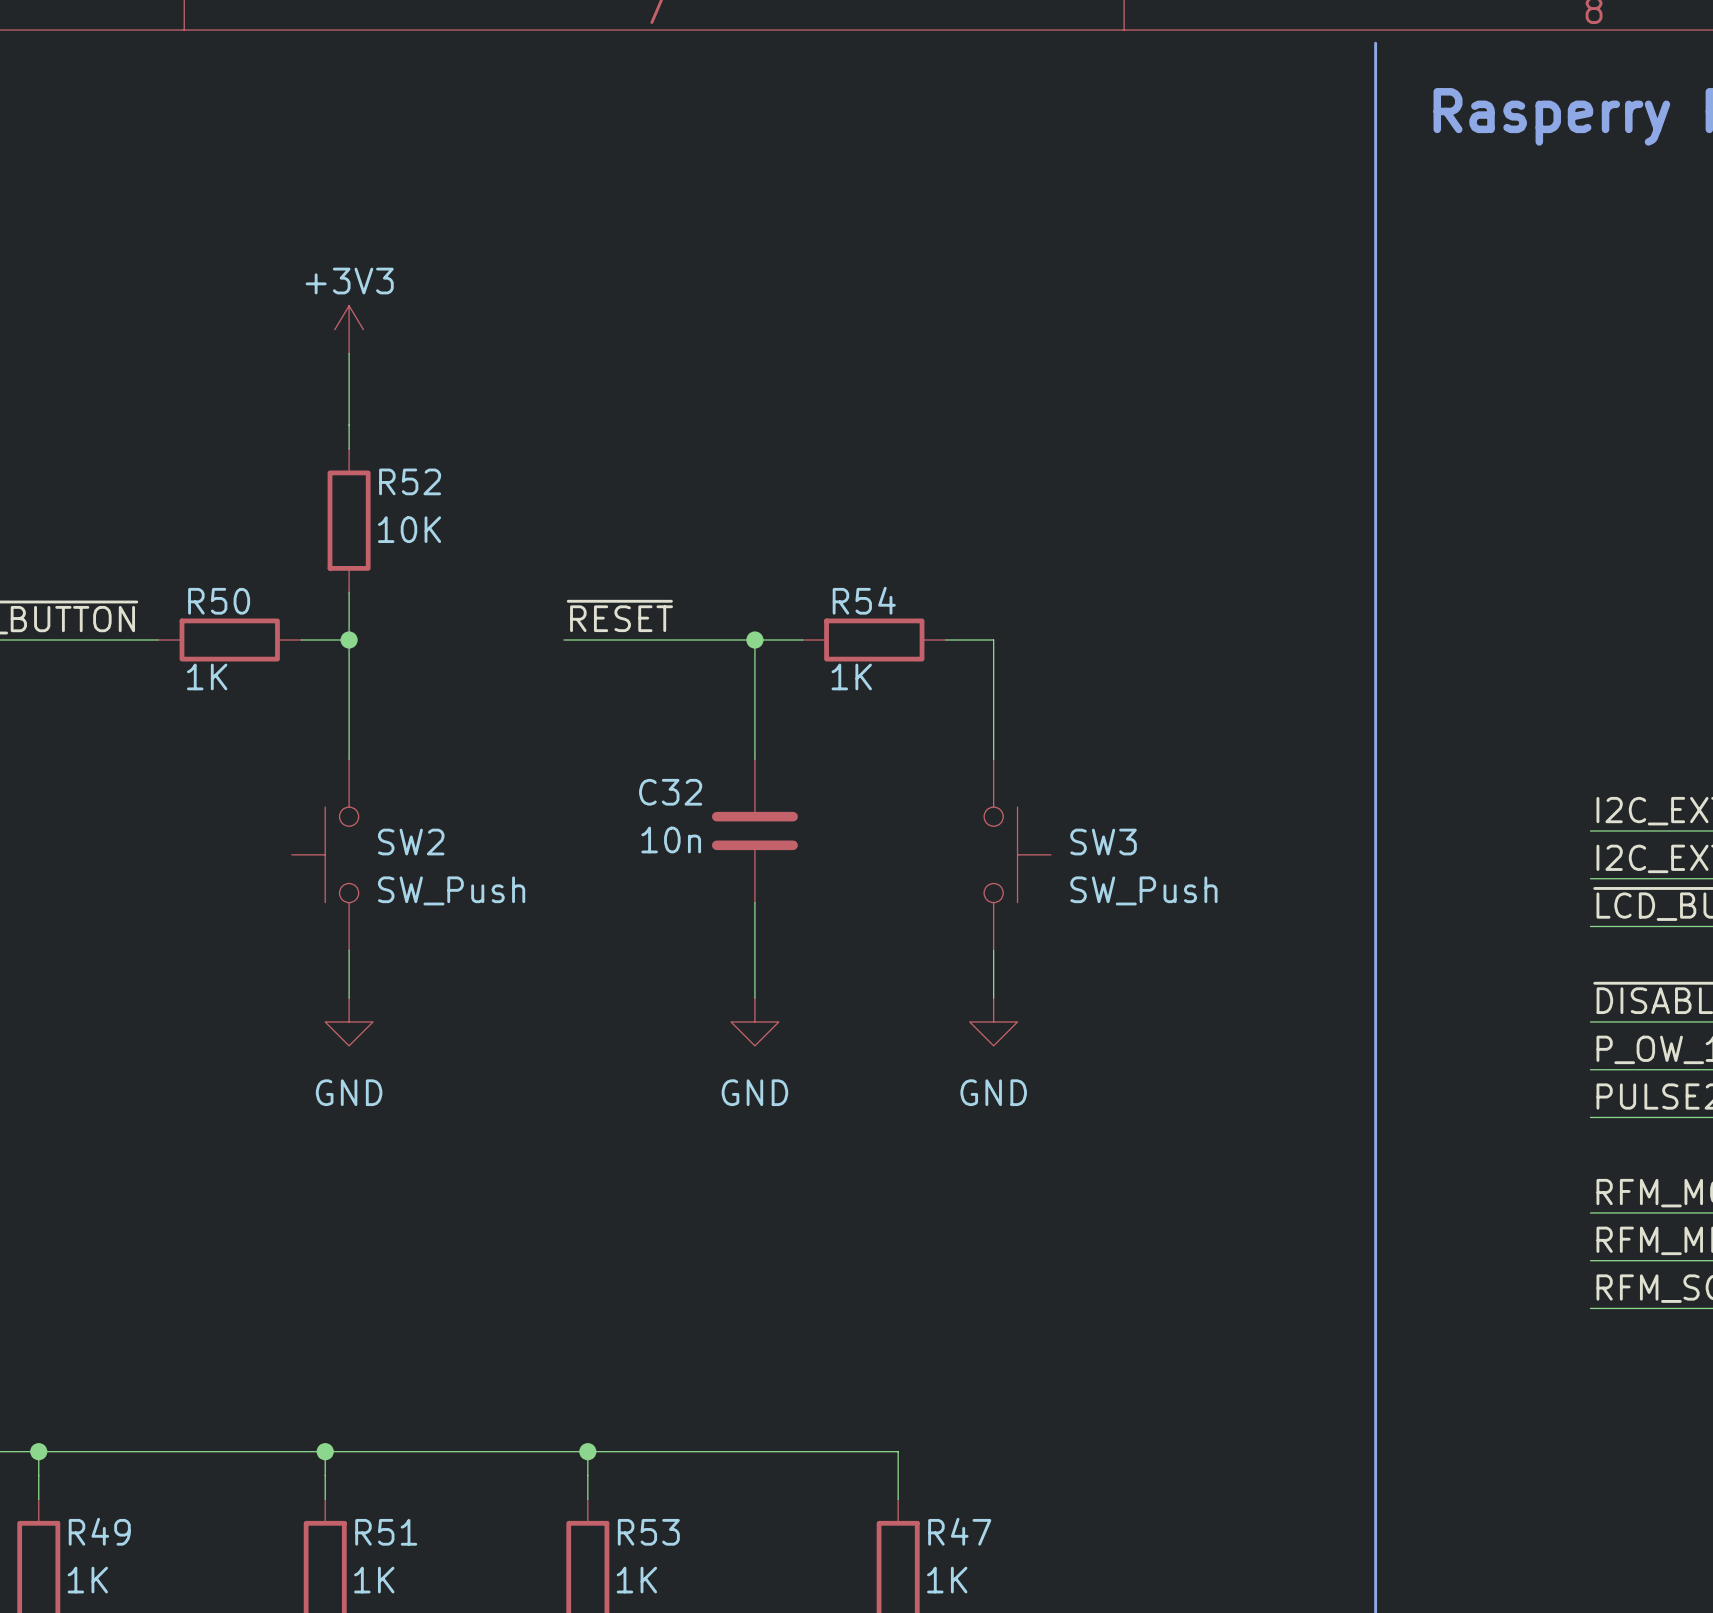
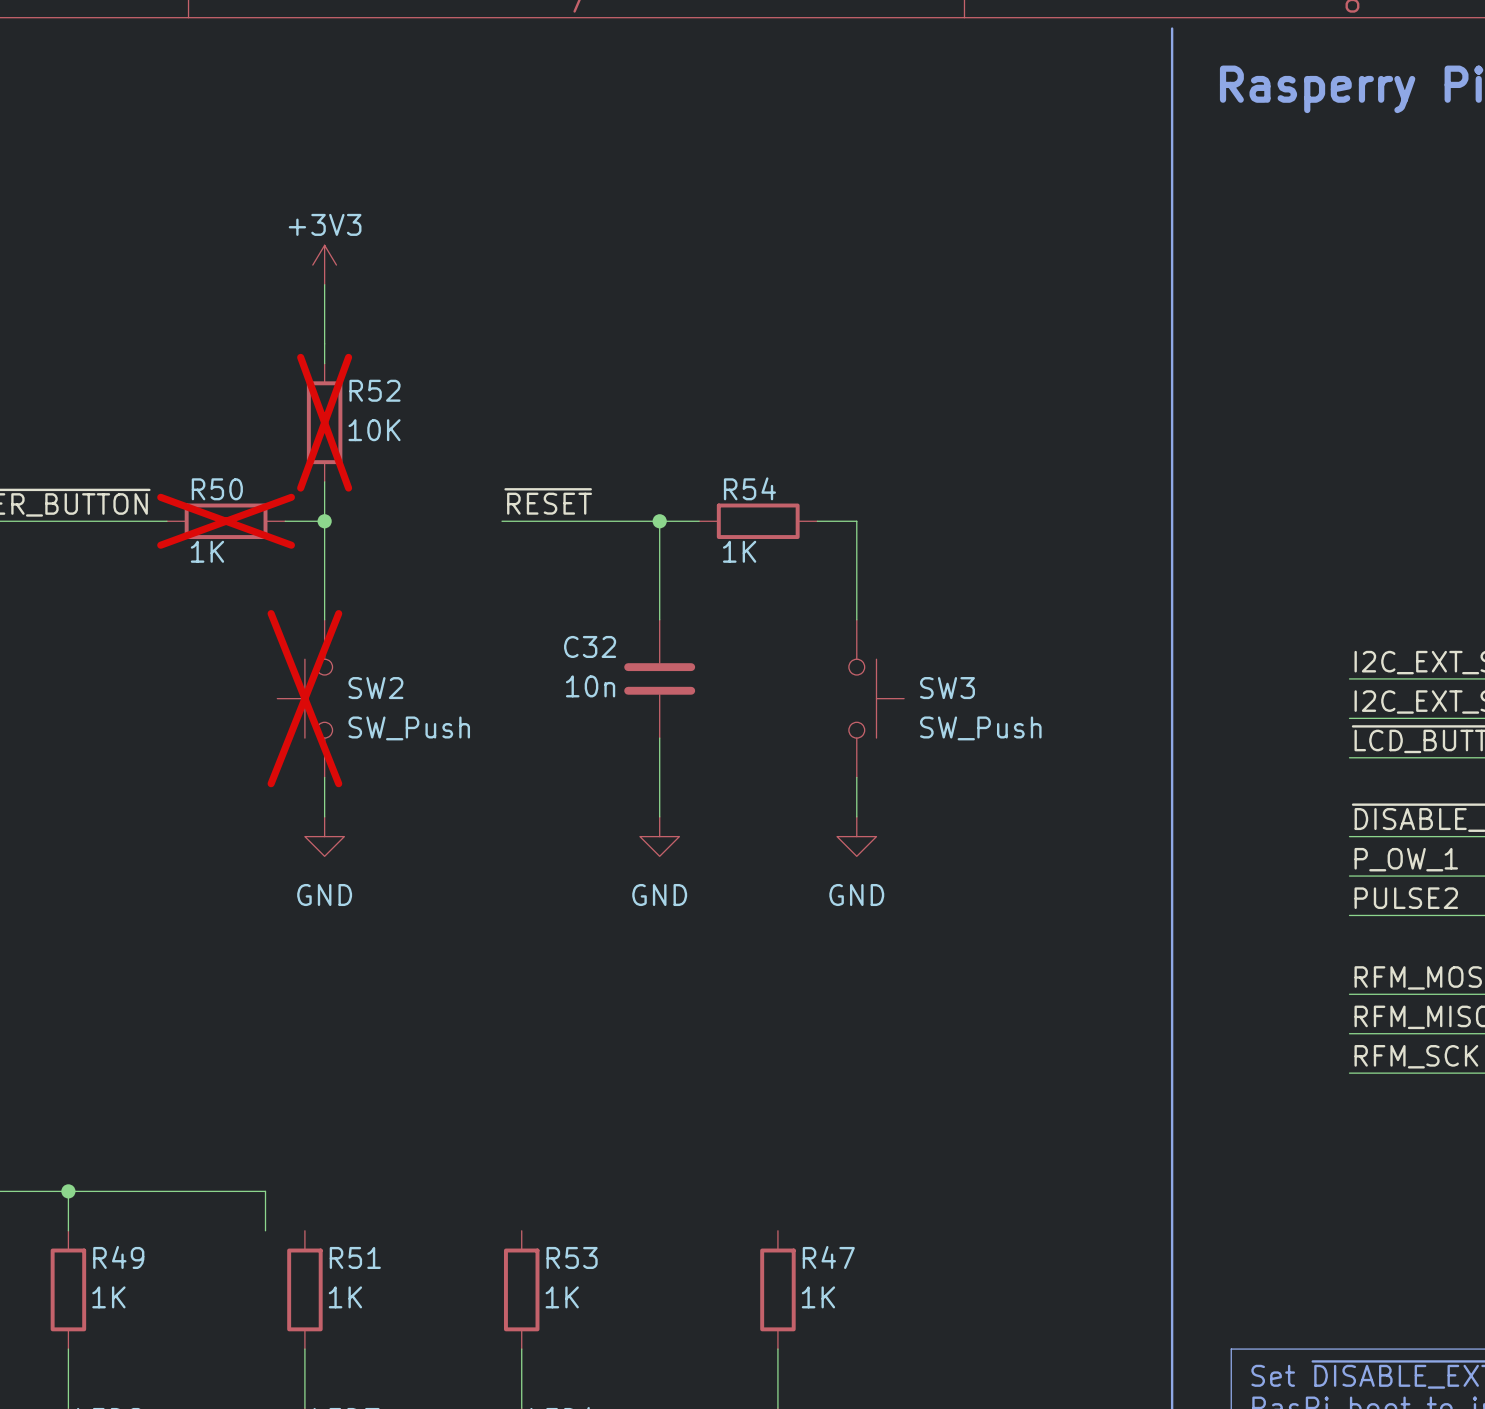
R52 do-not-place cross: none -> (324, 422)
R50 do-not-place cross: none -> (226, 521)
SW2 do-not-place cross: none -> (304, 698)
wire: (277, 1451) (898, 1451) (898, 1499) -> (265, 1191) (265, 1230)
wire: (325, 1451) (325, 1499) -> none
junction: (325, 1451) -> none
wire: (587, 1451) (587, 1499) -> none
junction: (587, 1451) -> none

